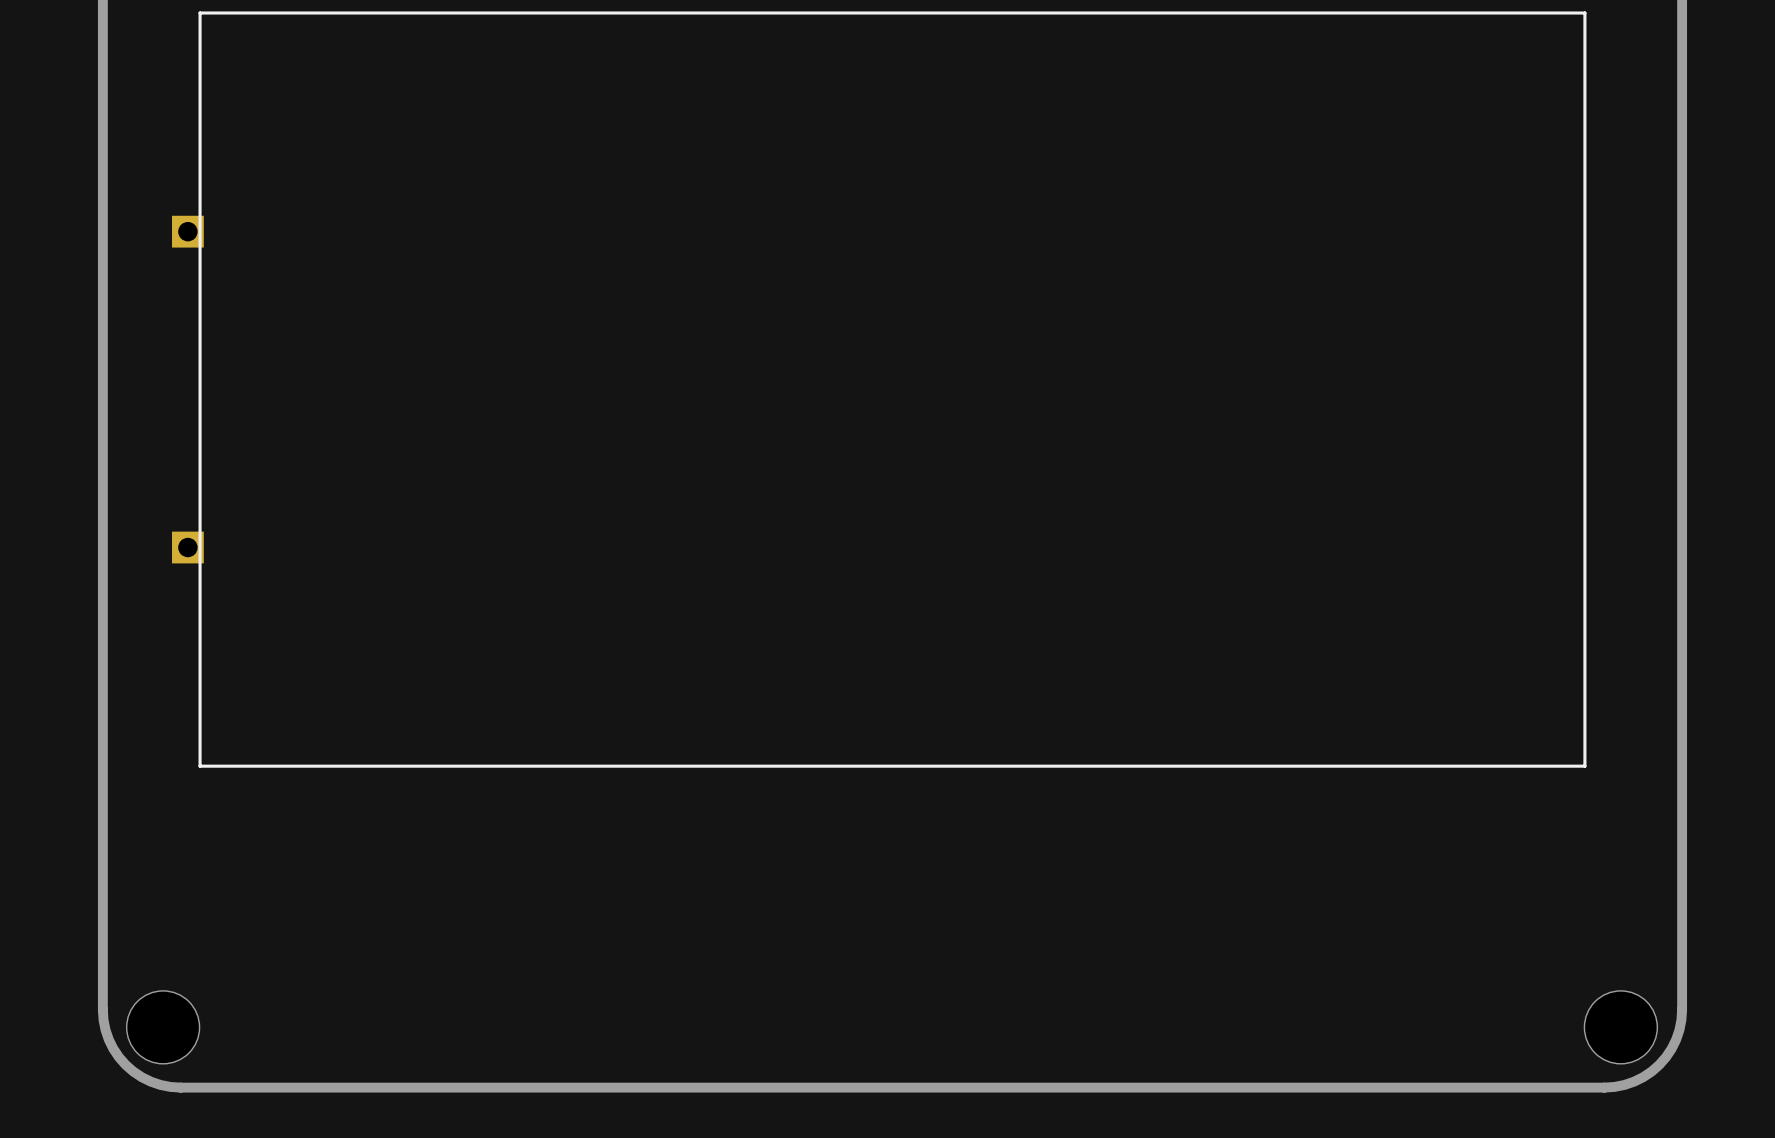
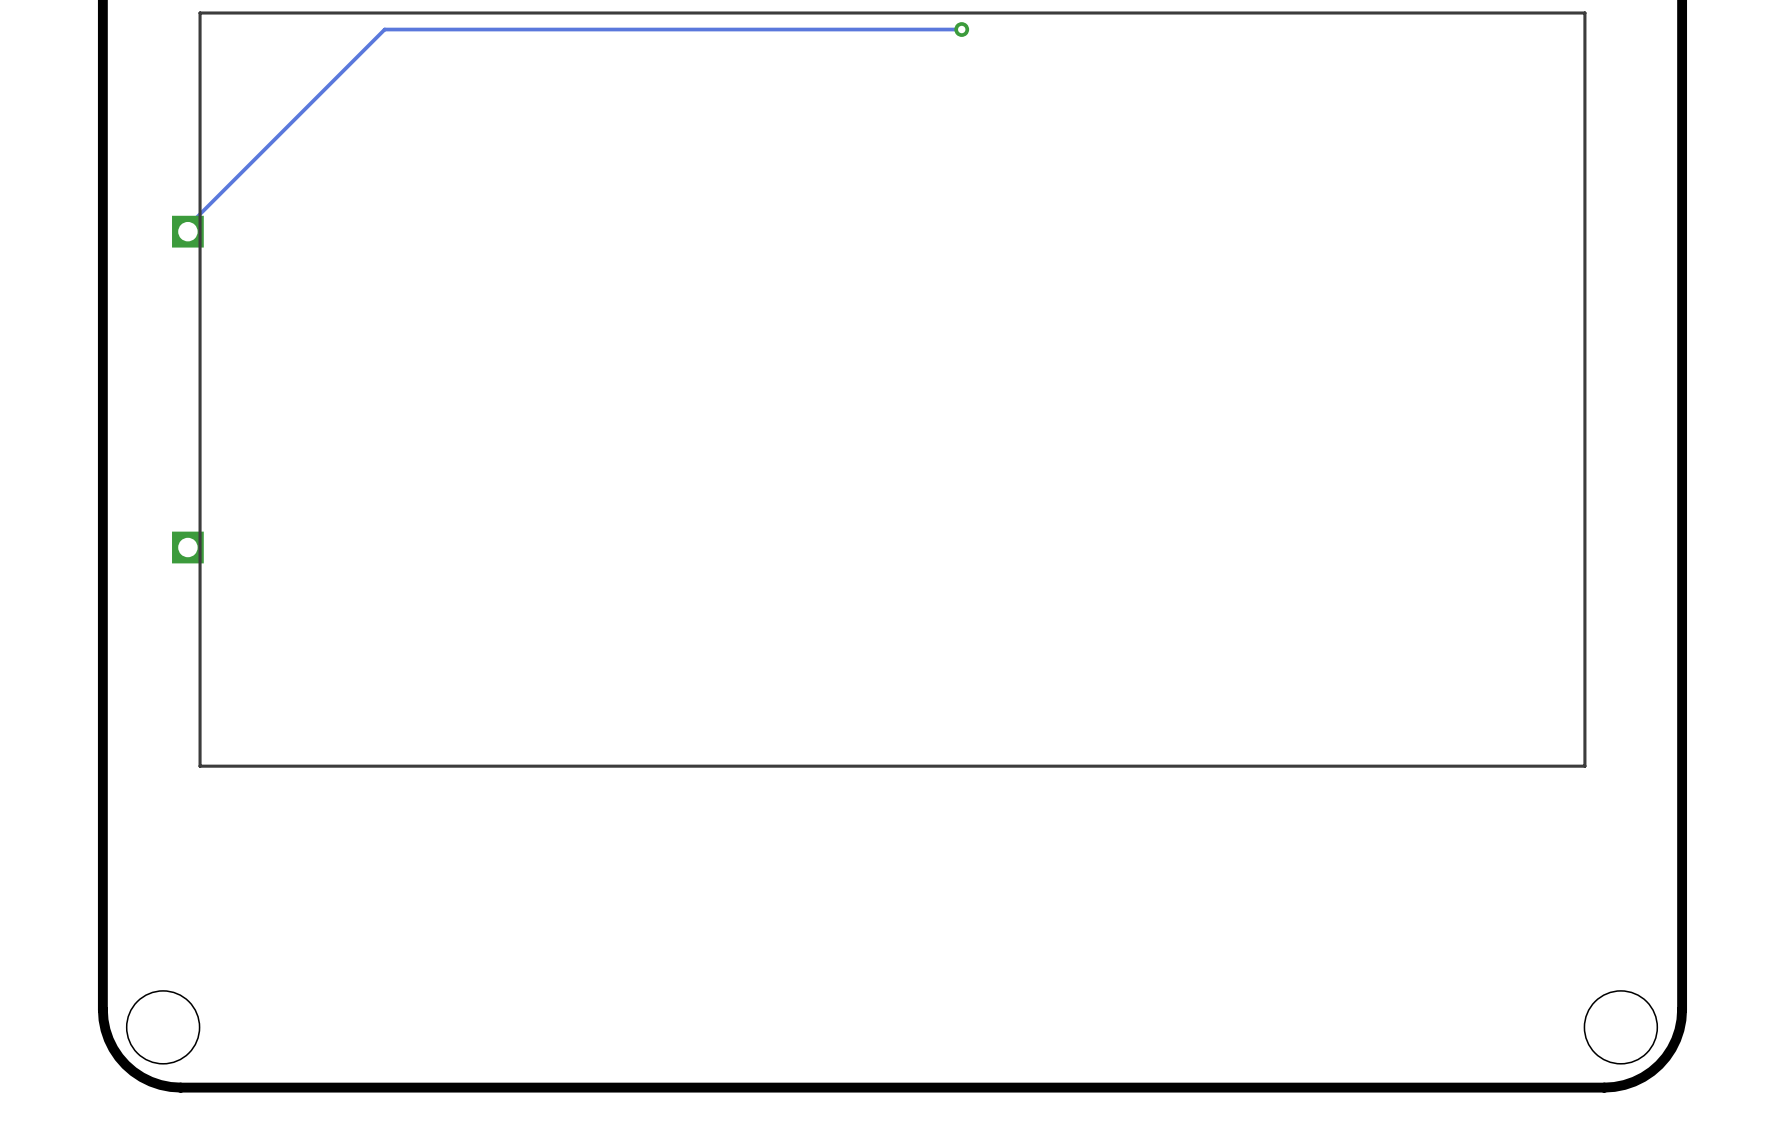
track: none -> (961, 29) (384, 29) (178, 236)
via: none -> (961, 29)

